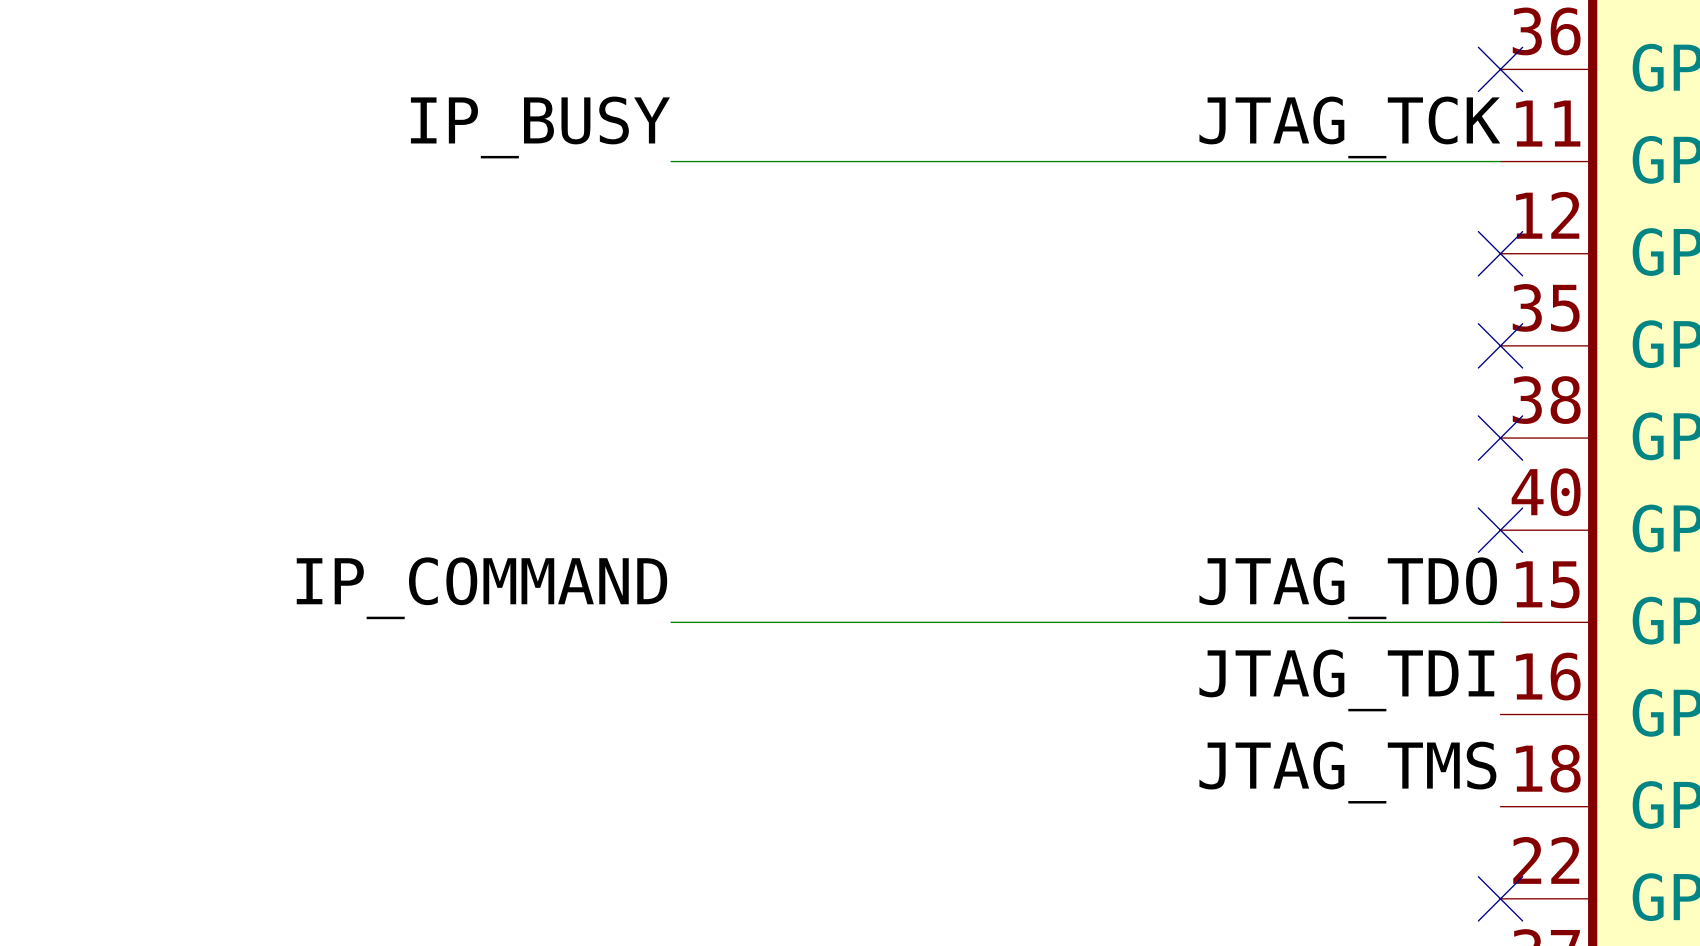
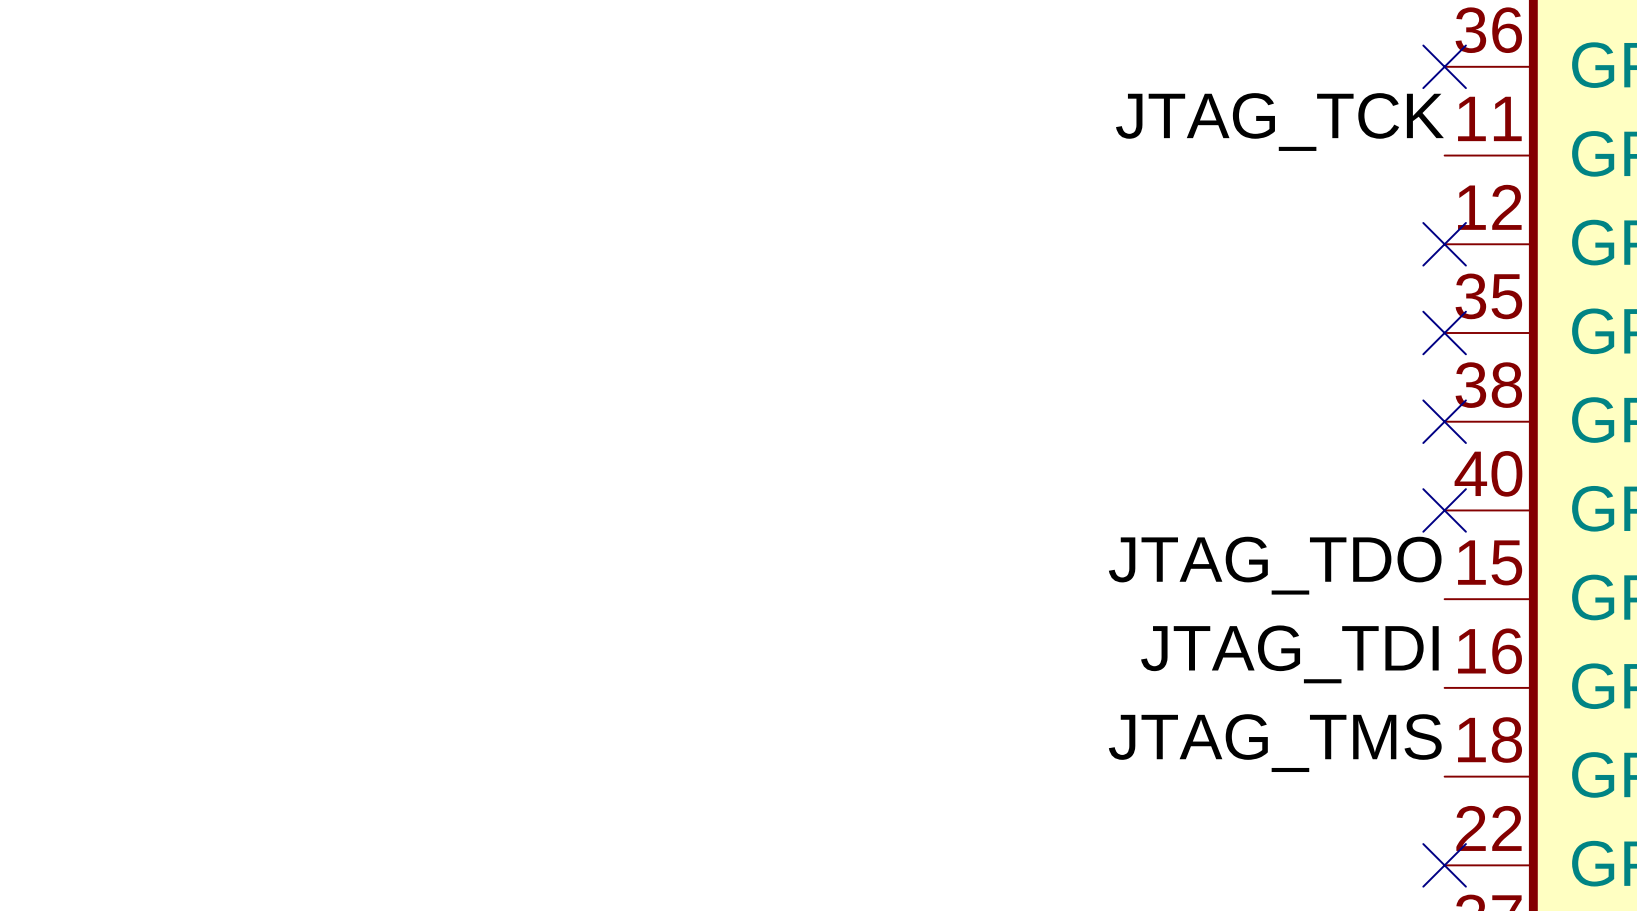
label: IP_BUSY (540, 127) -> none
wire: (671, 161) (1500, 161) -> none
label: IP_COMMAND (481, 588) -> none
wire: (671, 622) (1500, 622) -> none

